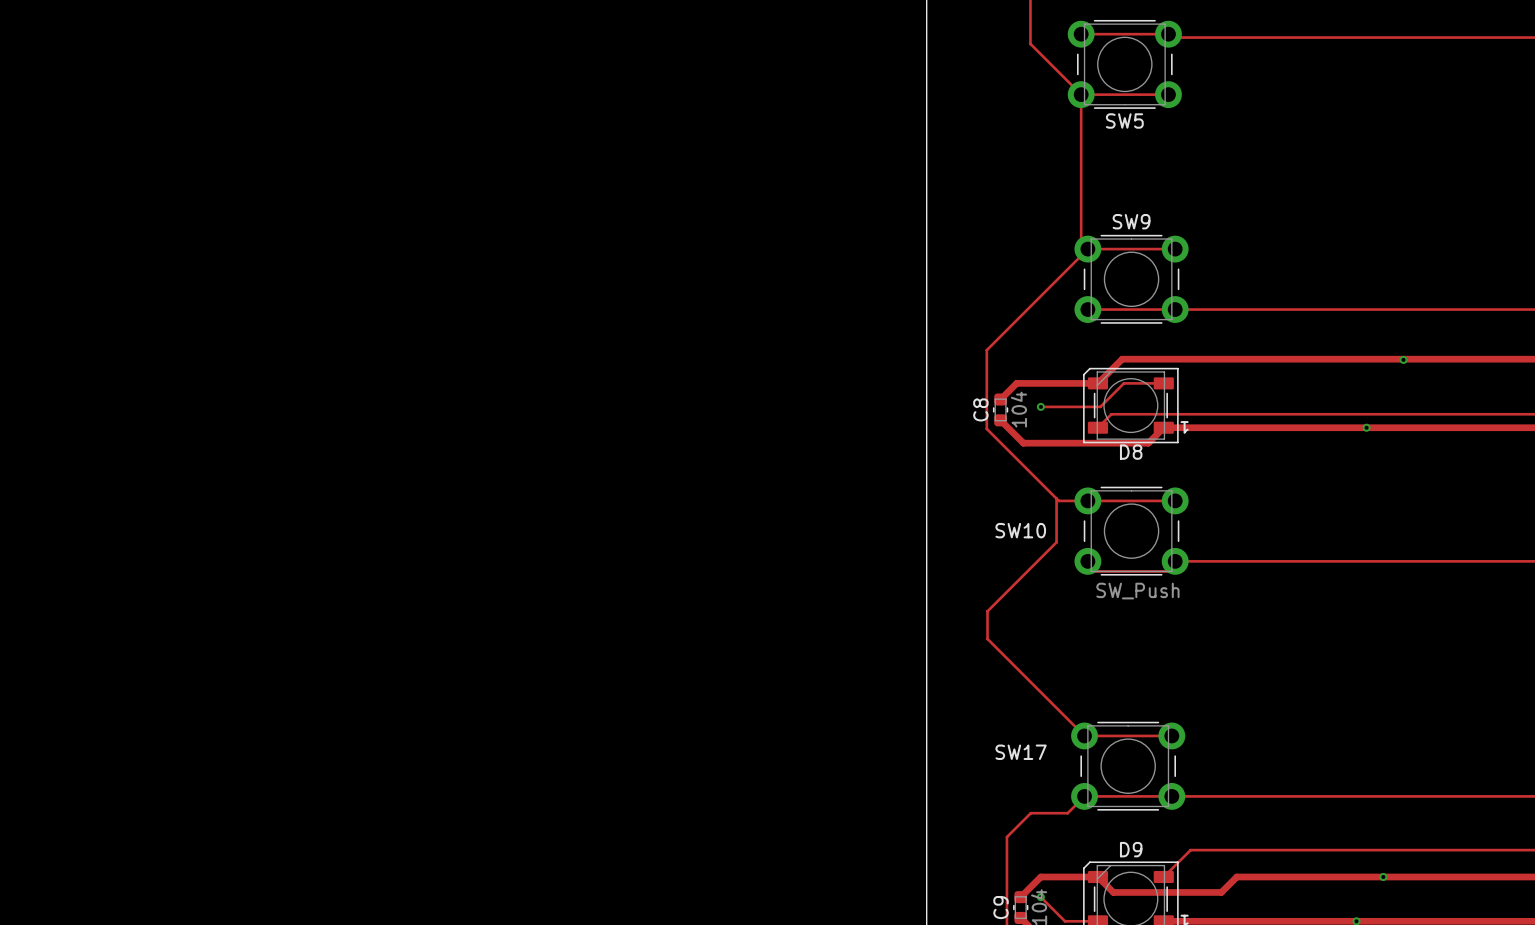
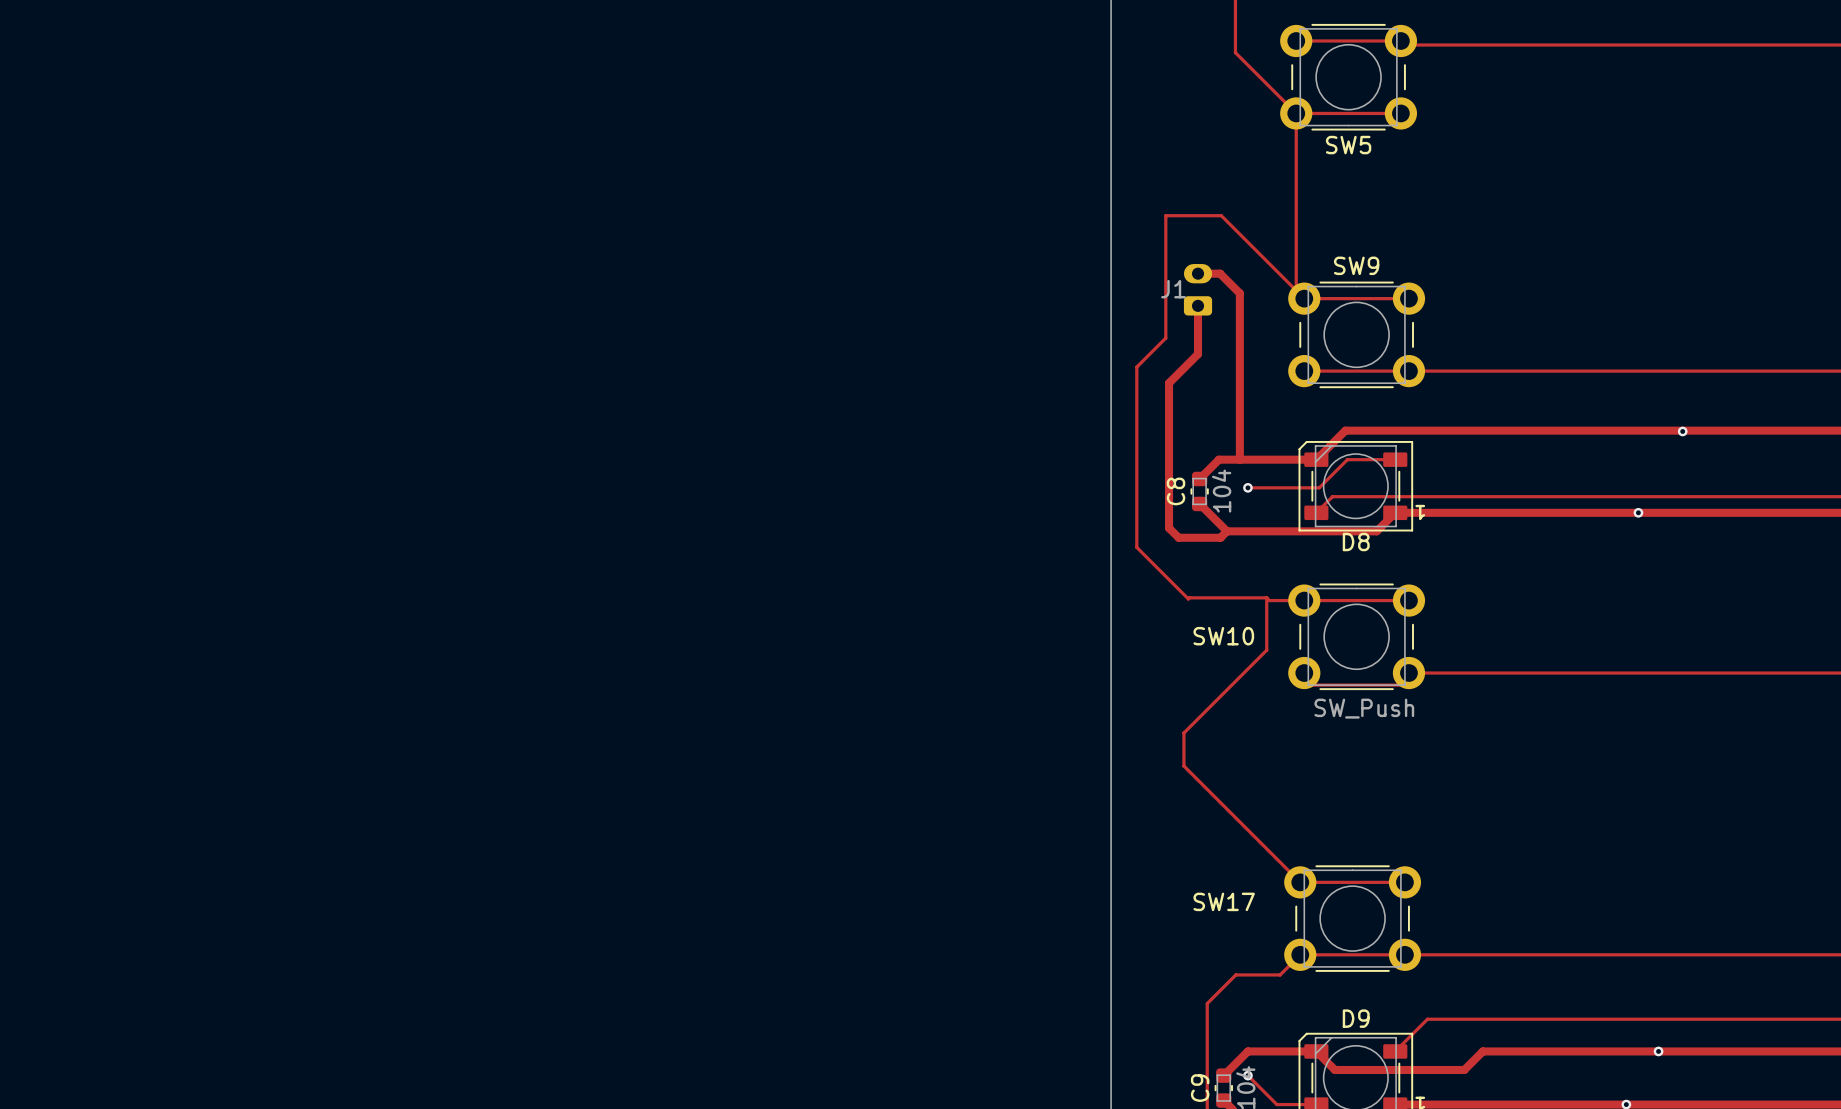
track: none -> (1198, 273) (1220, 273) (1239, 293) (1239, 459)
J1: none -> (1198, 289)
track: (1087, 249) (986, 350) (986, 428) (1056, 498) -> (1296, 290) (1221, 215) (1165, 215) (1165, 338) (1136, 367) (1136, 547) (1188, 598) (1266, 597)
track: none -> (1198, 305) (1198, 354) (1169, 383) (1169, 528) (1178, 537) (1220, 537) (1227, 531)

